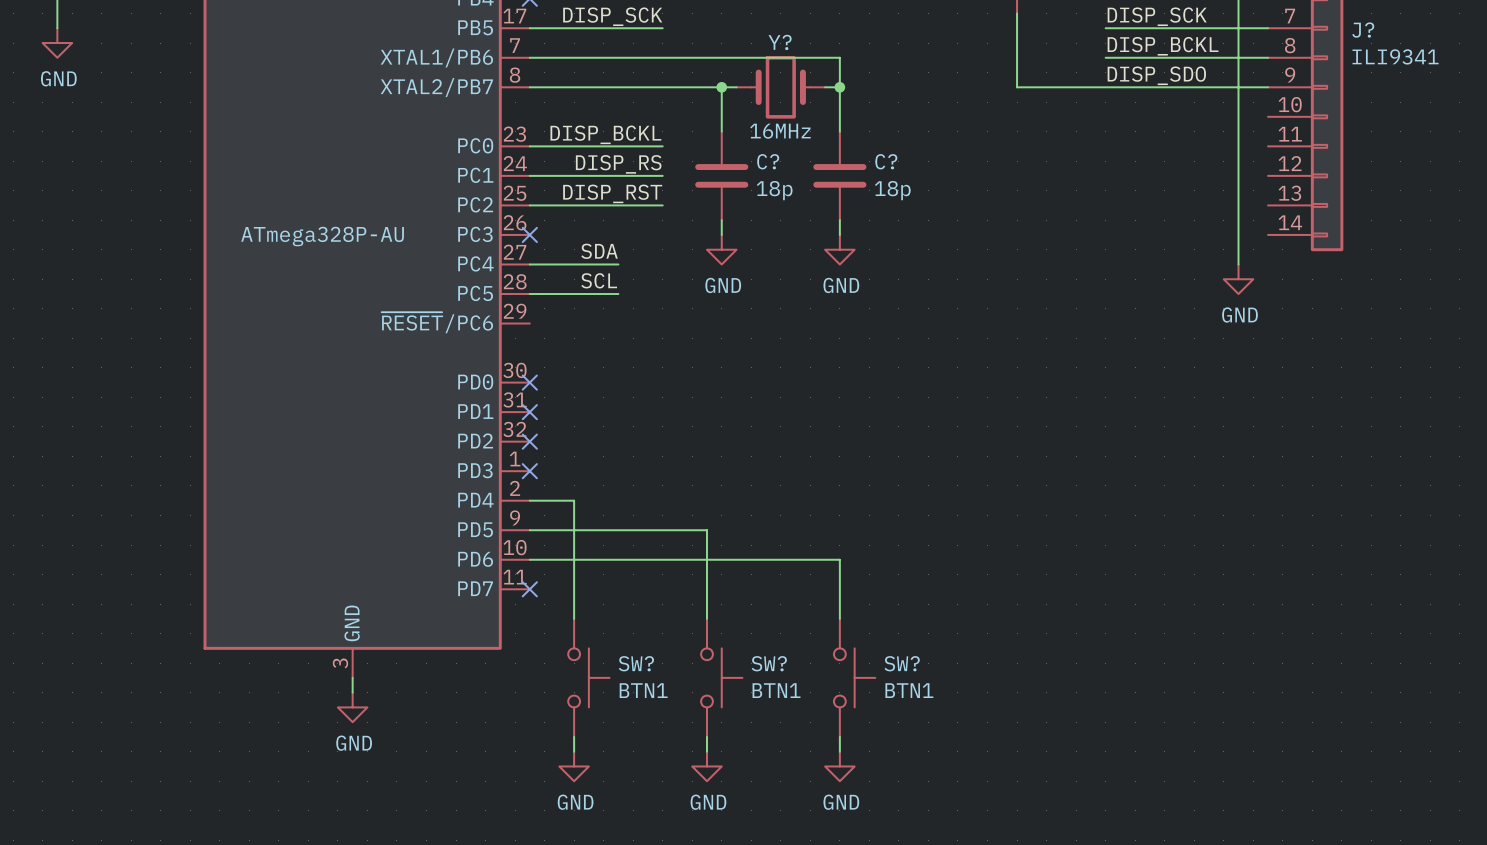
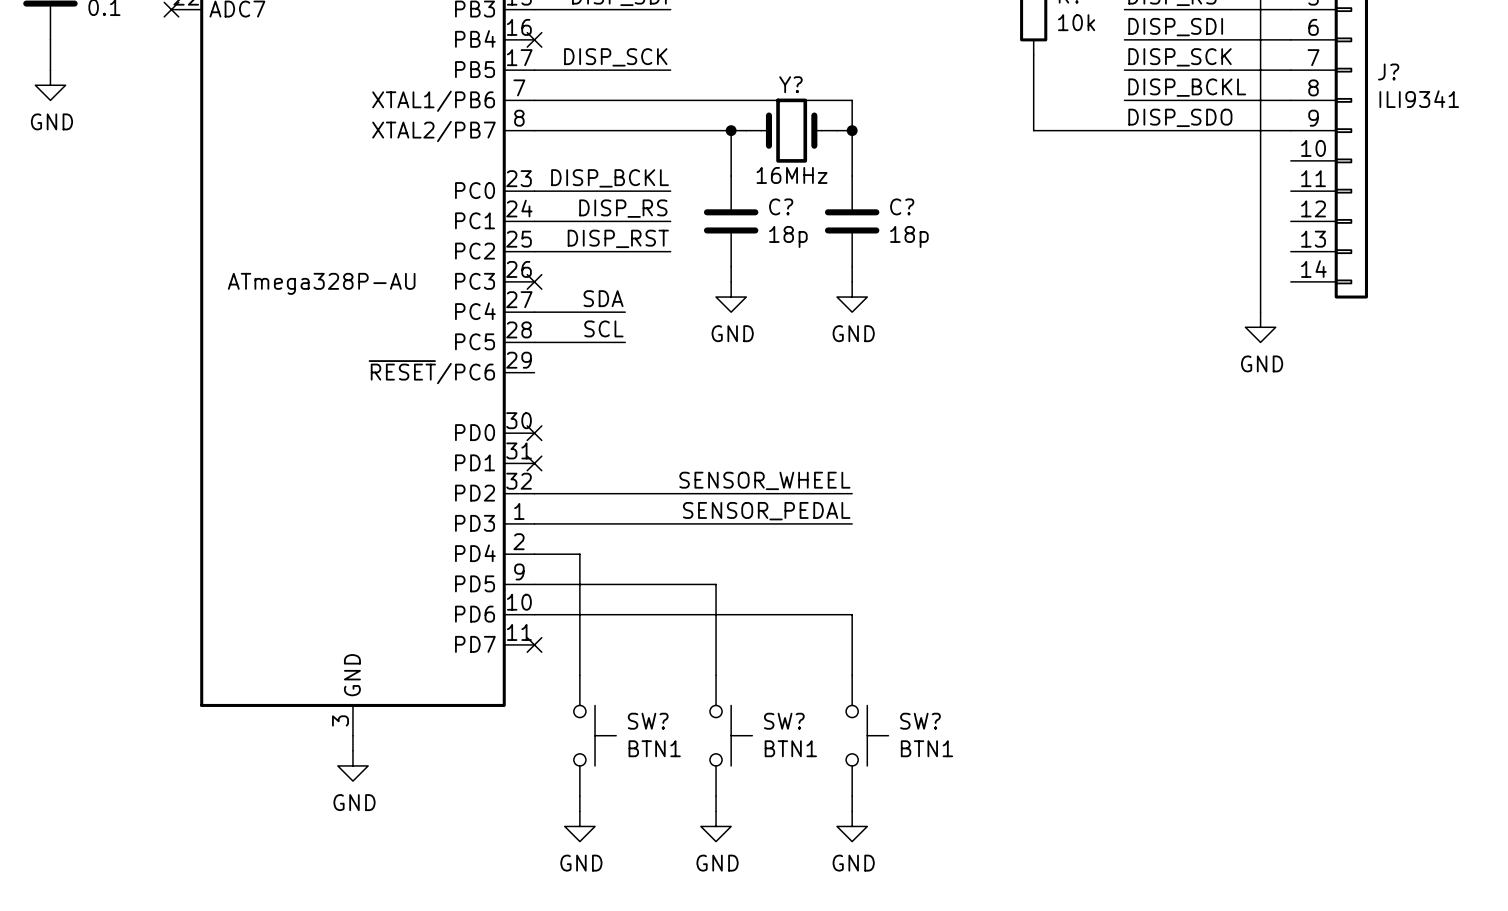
label: none -> SENSOR_WHEEL (764, 480)
wire: none -> (534, 493) (852, 493)
no-connect mark: (529, 441) -> none
label: none -> SENSOR_PEDAL (766, 511)
wire: none -> (534, 523) (852, 523)
no-connect mark: (529, 471) -> none

